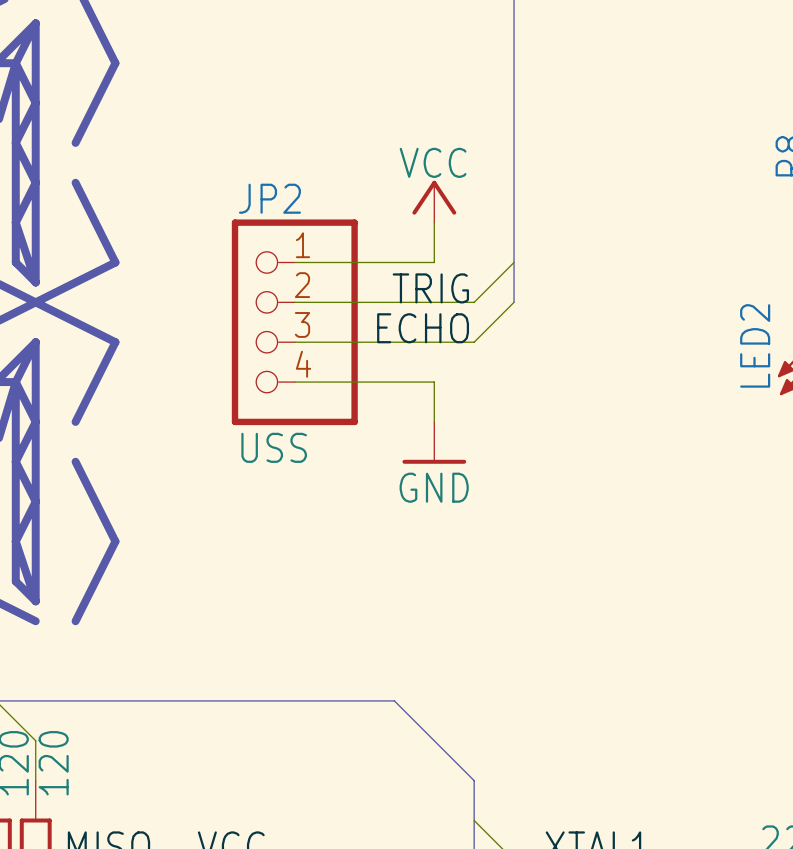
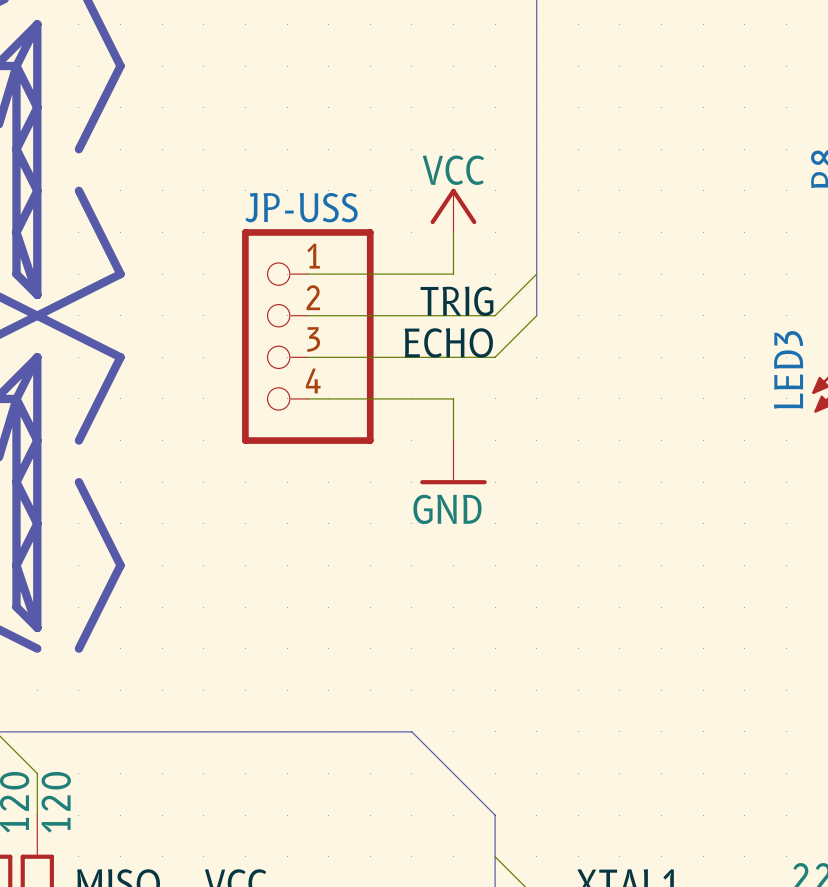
JP2 name: JP2 (269, 198) -> JP-USS (301, 207)
LED2 name: LED2 (755, 345) -> LED3 (788, 369)
JP2 value: USS (274, 447) -> none

